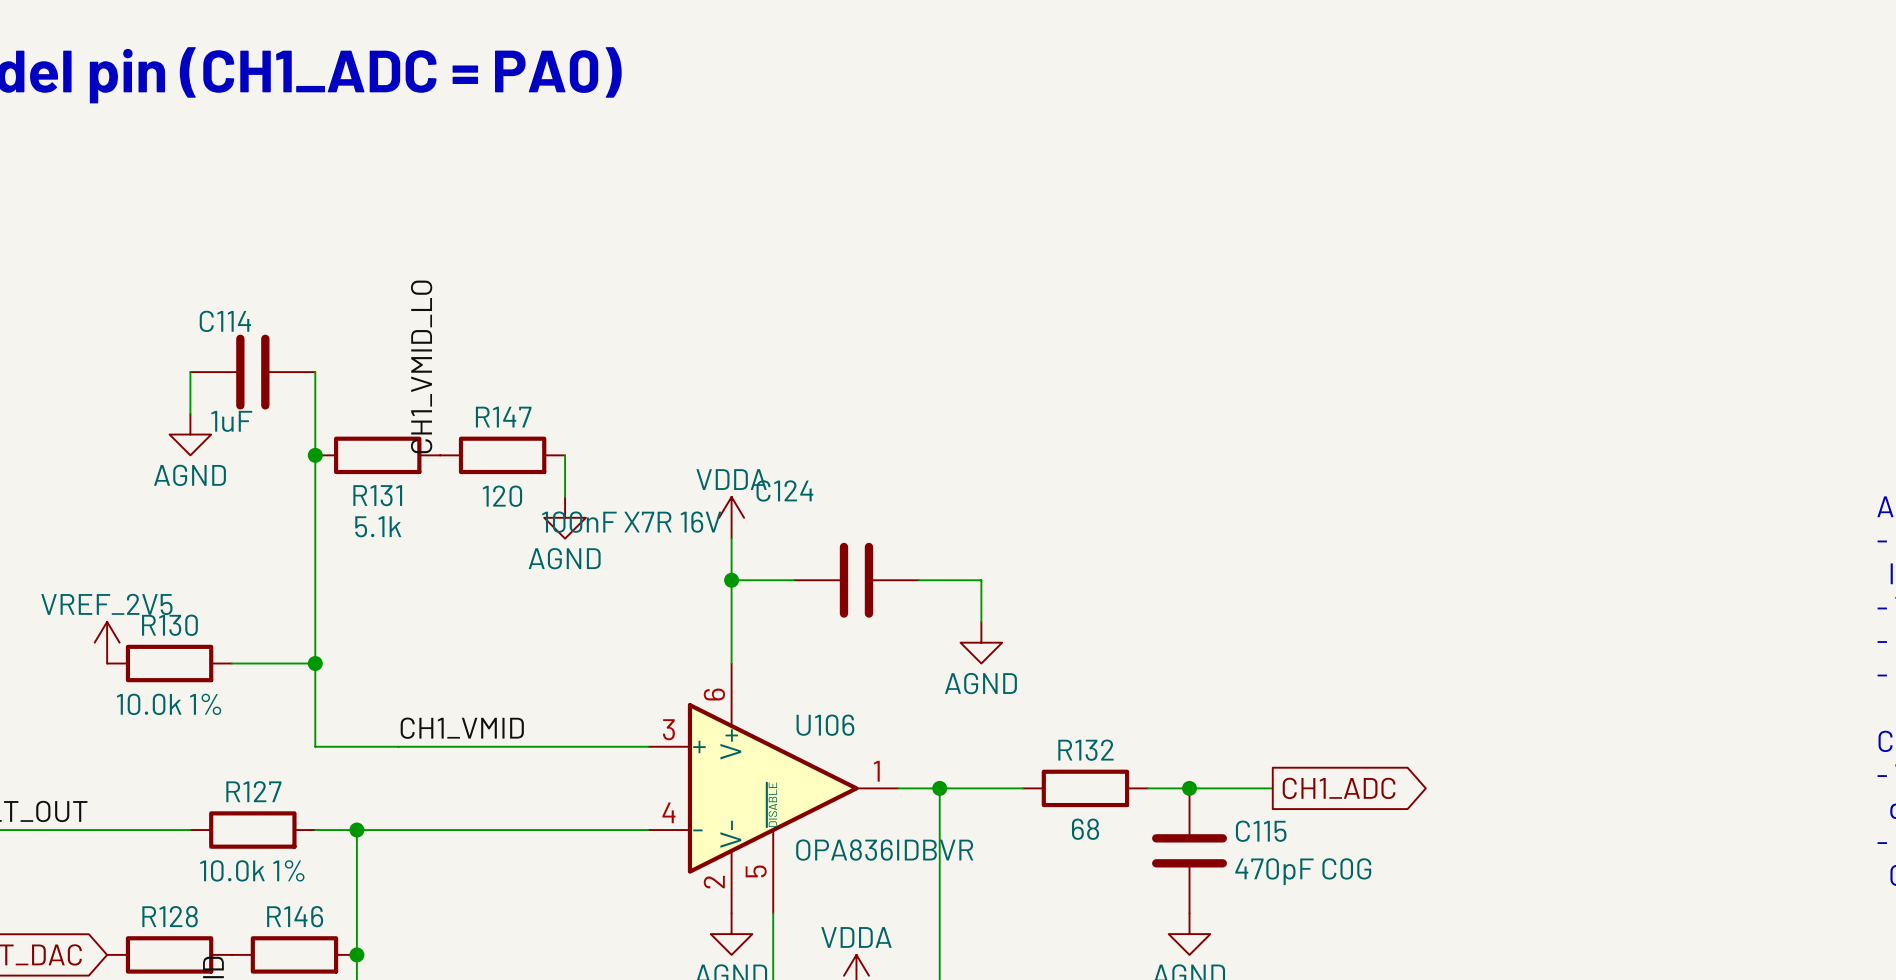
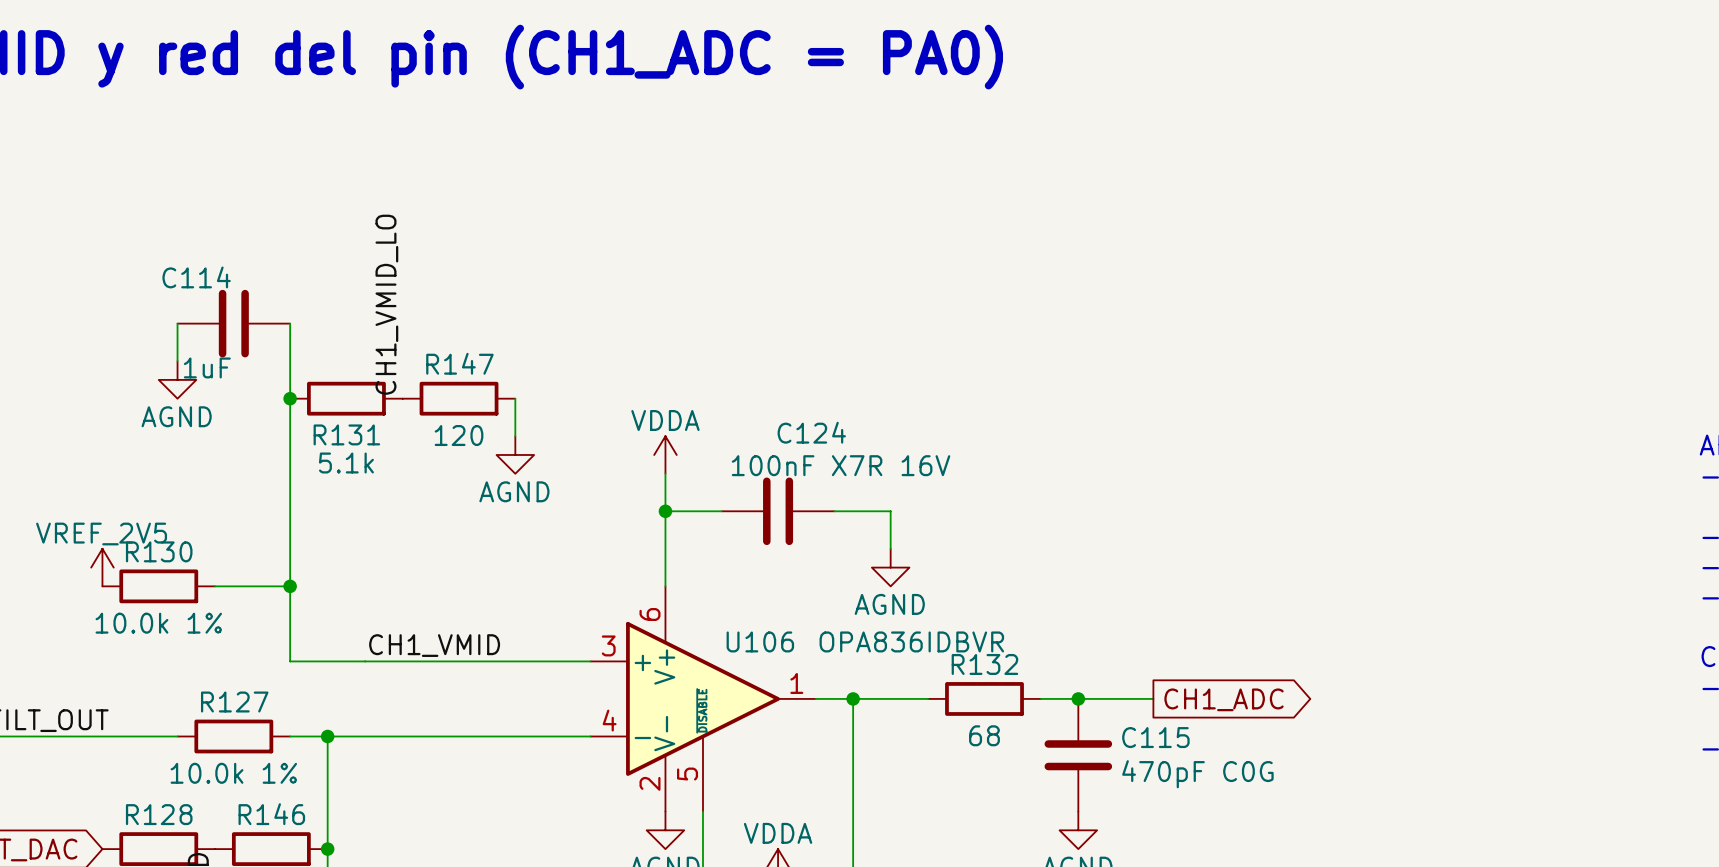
C124 name position: C124 (784, 490) -> C124 (811, 432)
C124 value position: 100nF X7R 16V (631, 522) -> 100nF X7R 16V (841, 465)
U106 value position: OPA836IDBVR (884, 850) -> OPA836IDBVR (911, 641)

